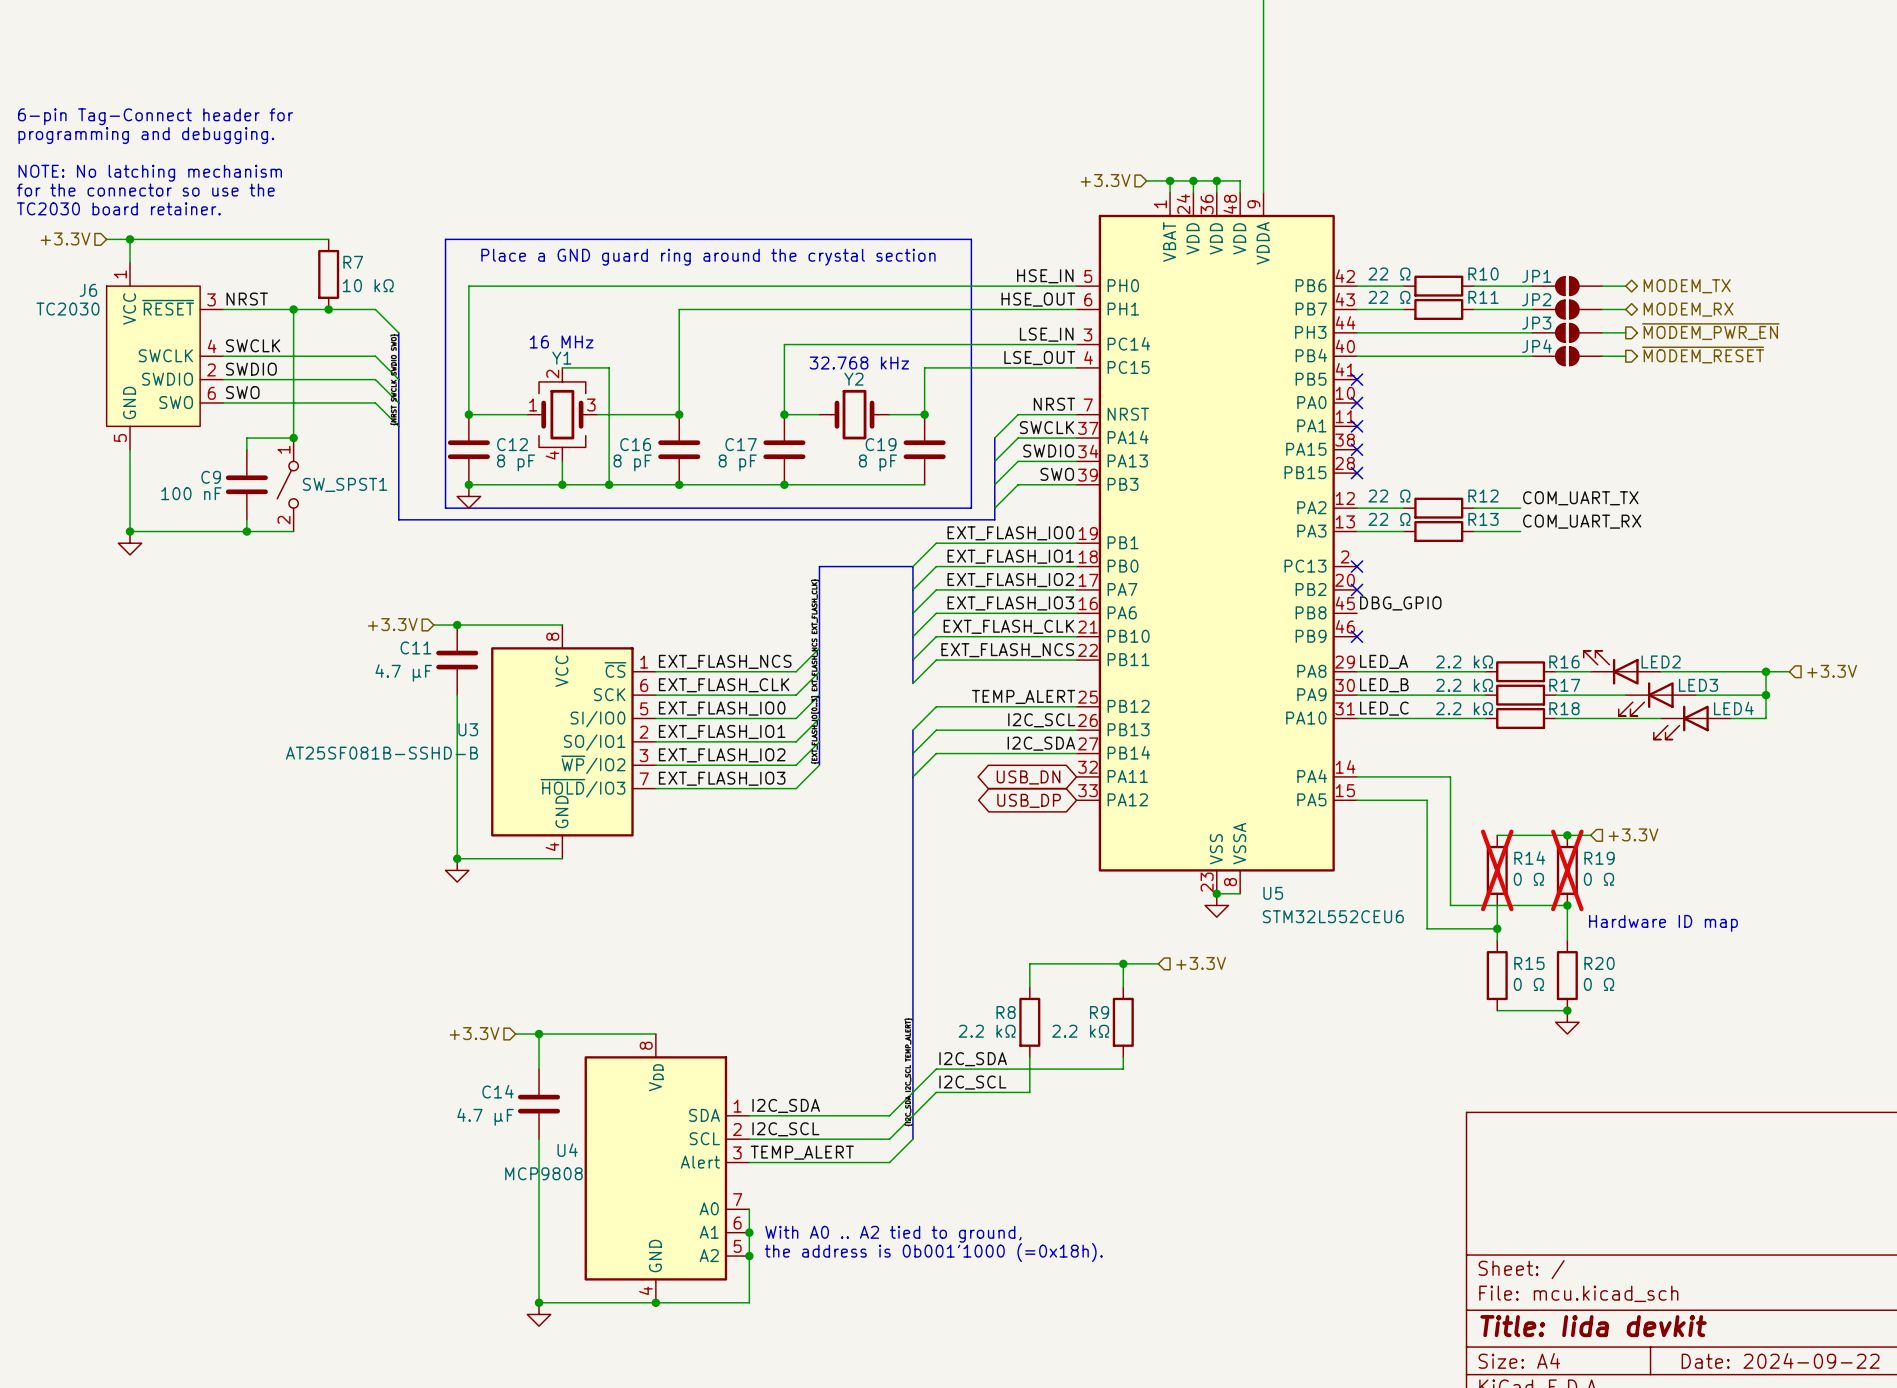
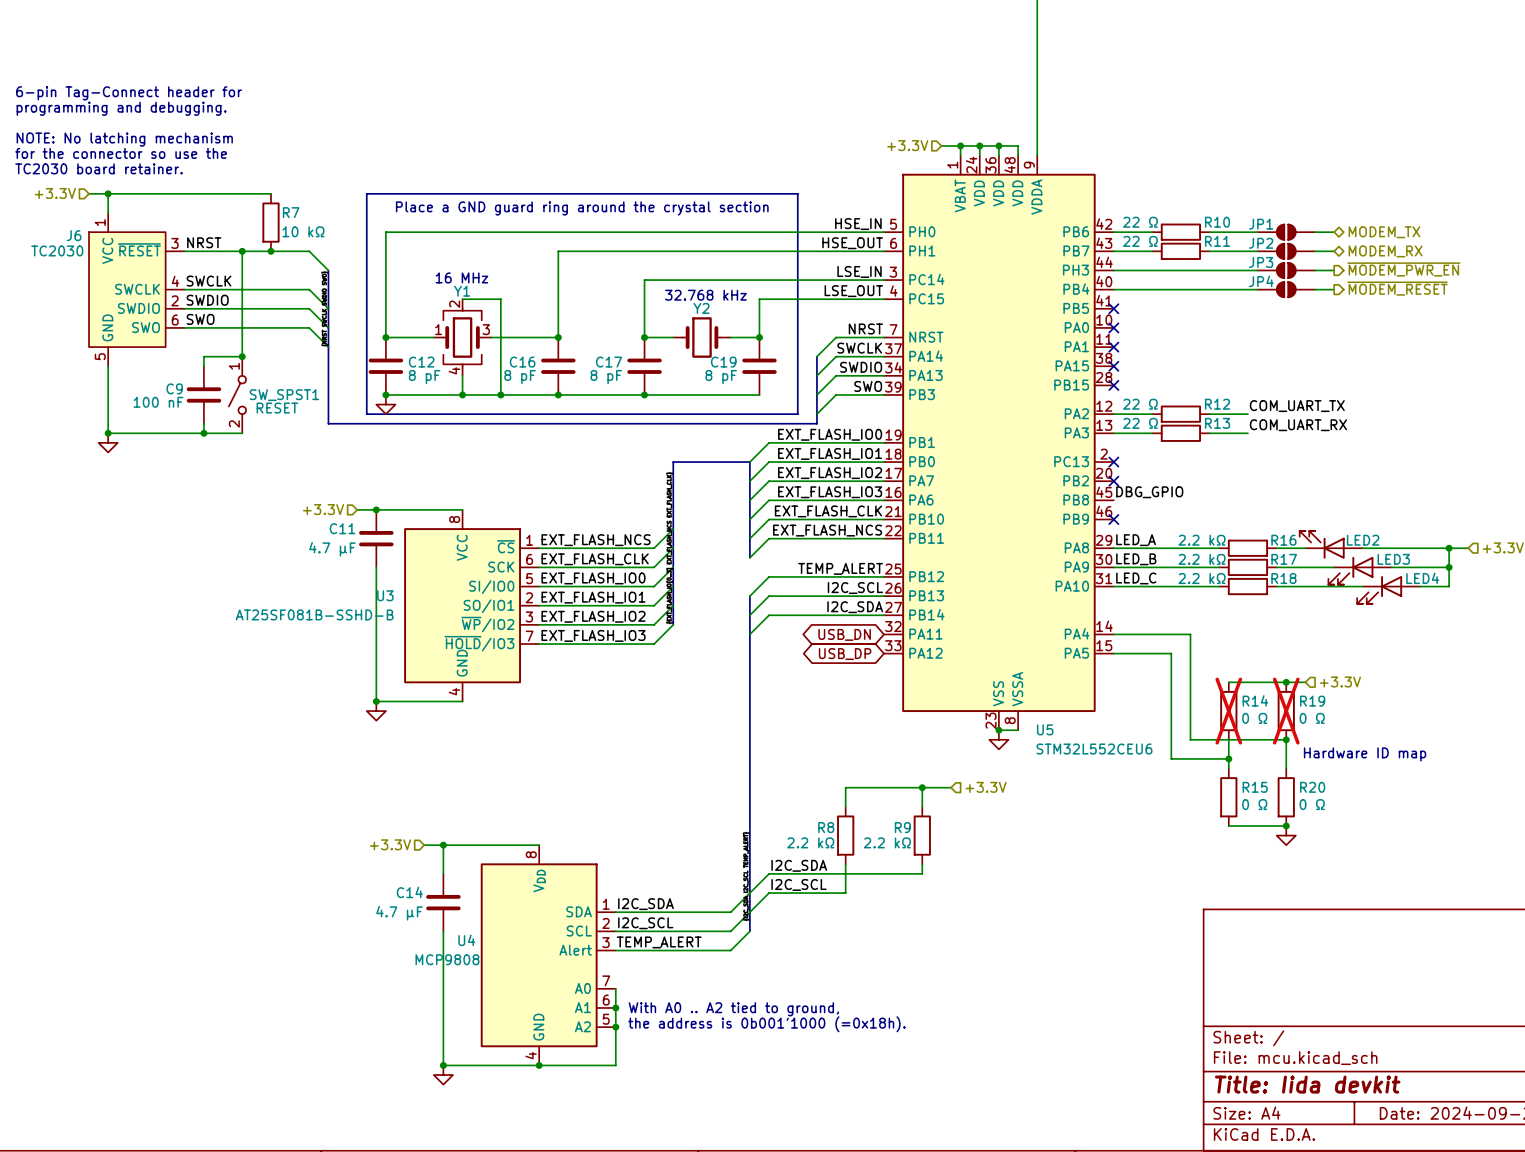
SW_SPST1 value: none -> RESET (277, 408)

